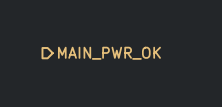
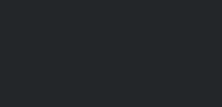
hierarchical label: MAIN_PWR_OK (109, 53) -> none

